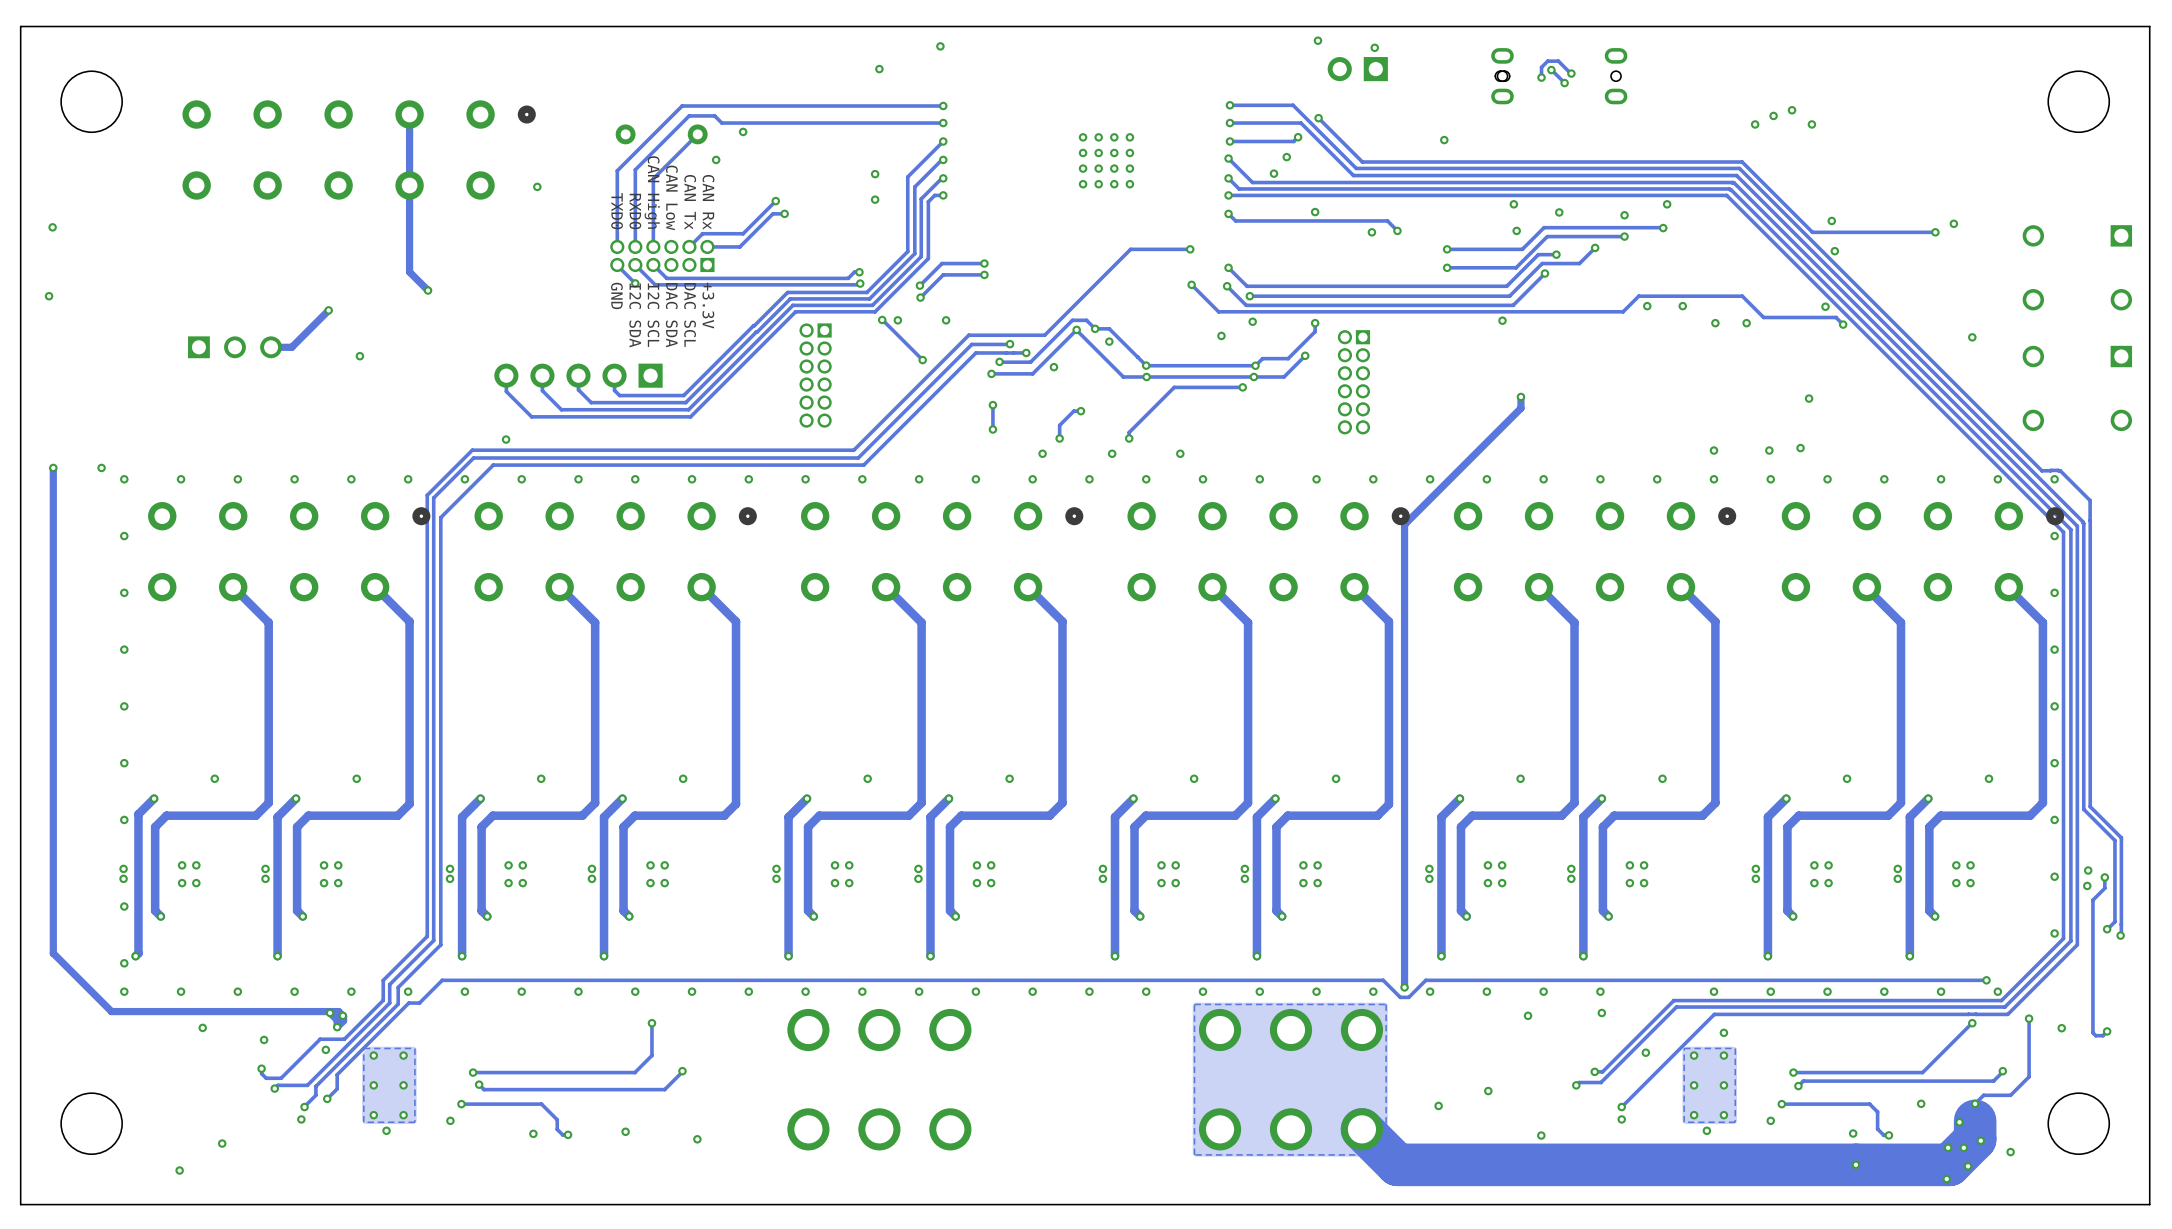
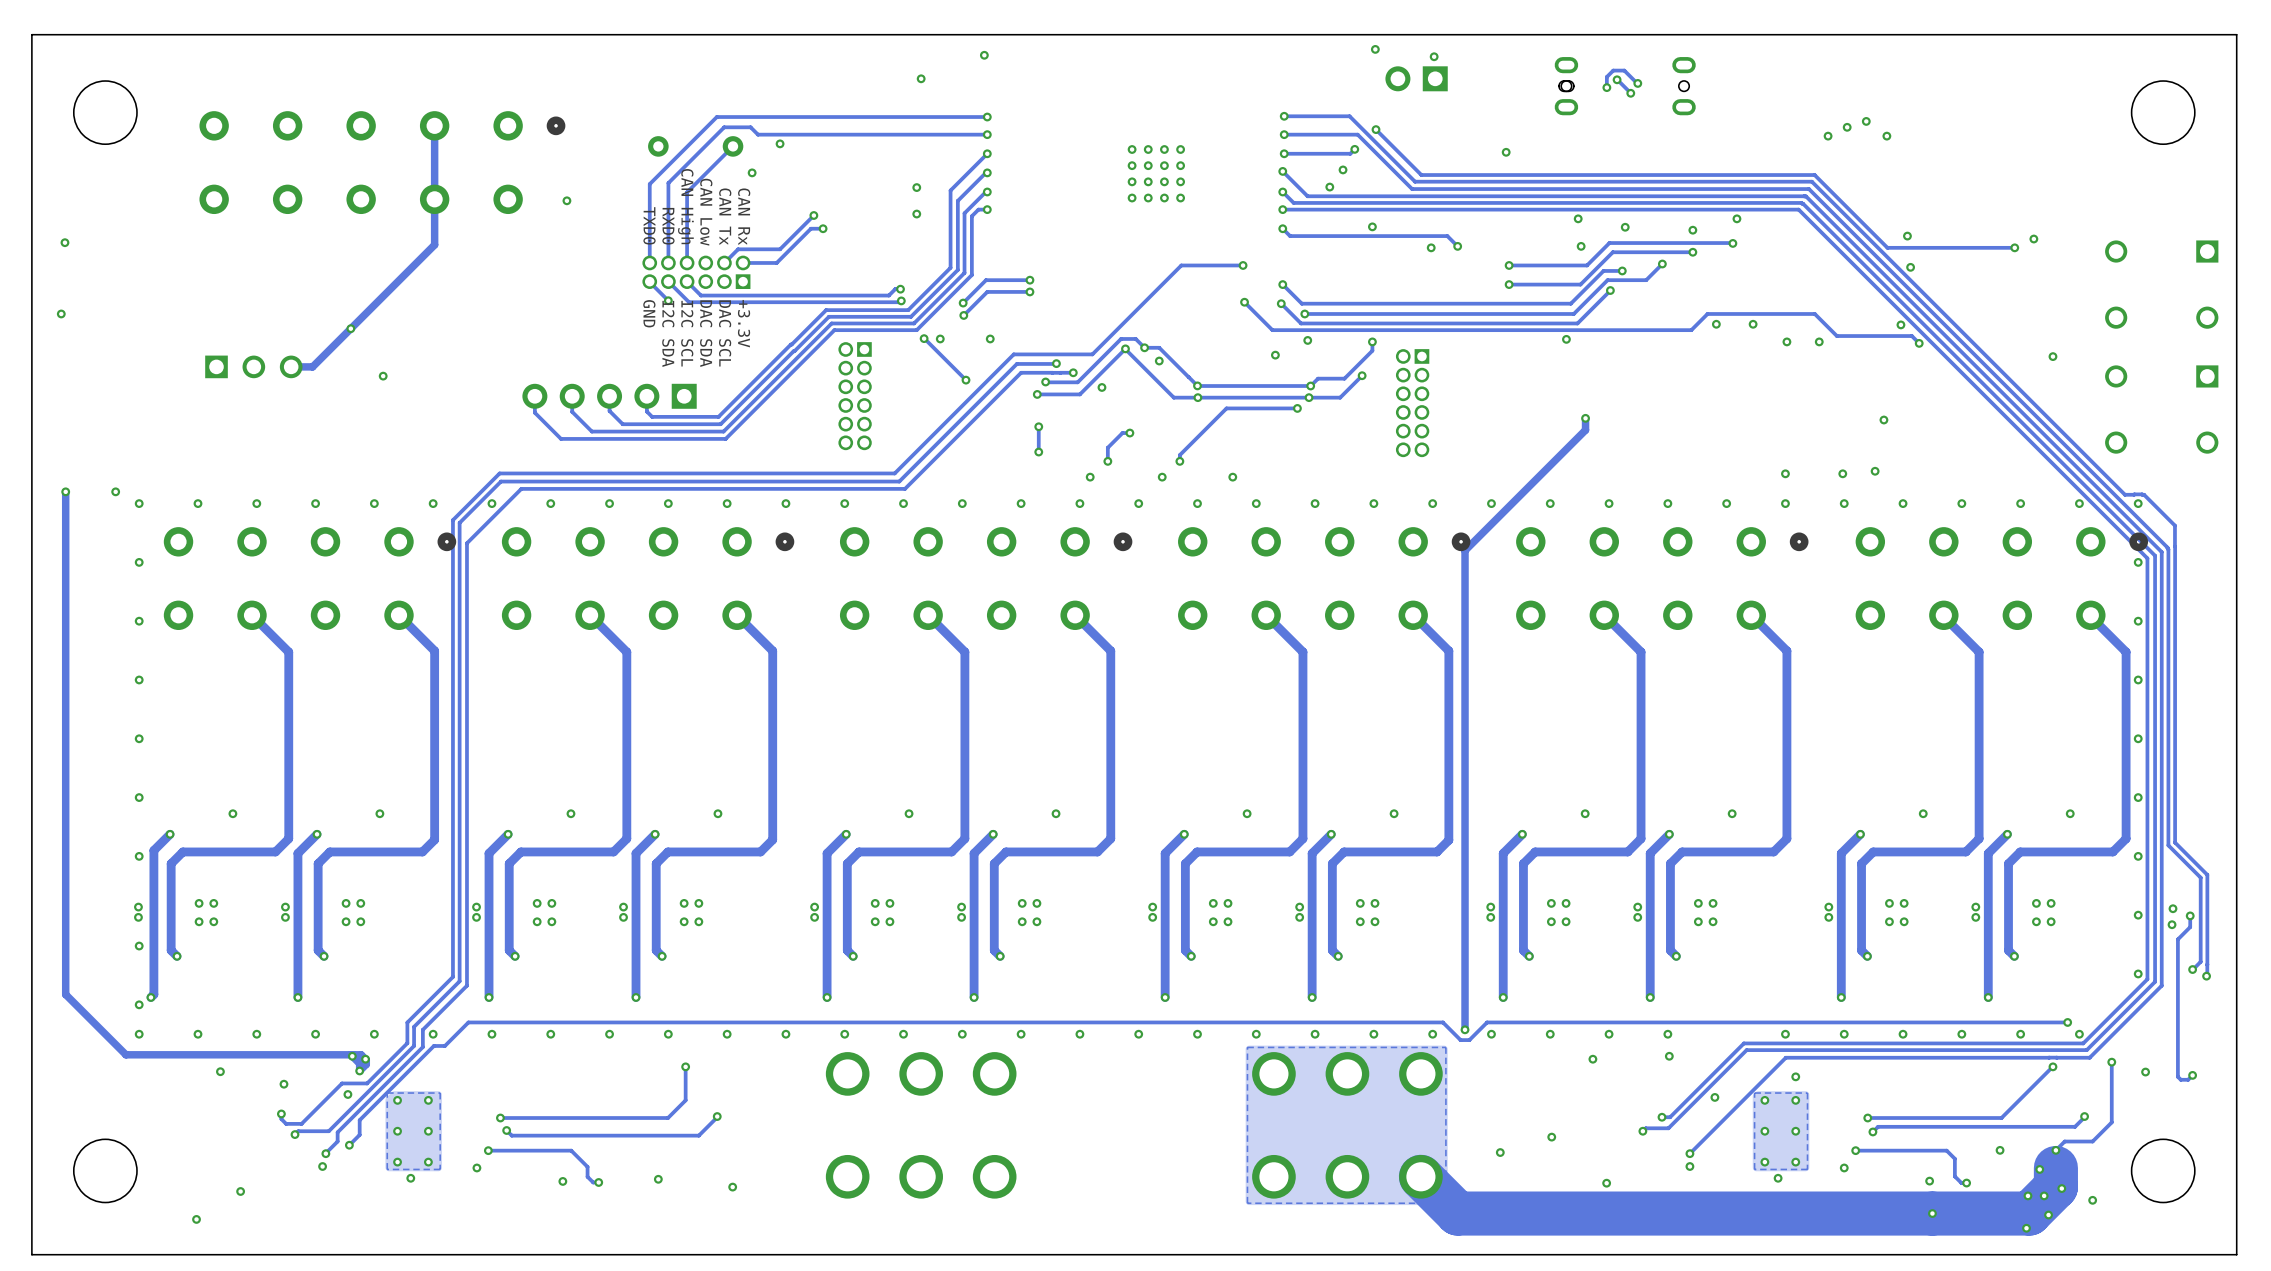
track: (409, 229) (409, 272) (428, 290) -> (434, 244) (350, 328)
via: (428, 290) -> none
via: (506, 439) -> none

